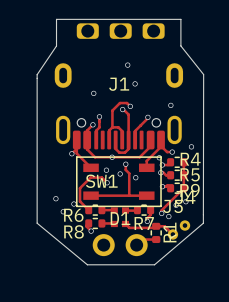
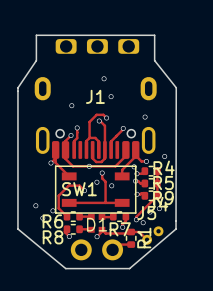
via position: (106, 170) -> (97, 236)
track: none -> (101, 229) (97, 236)

